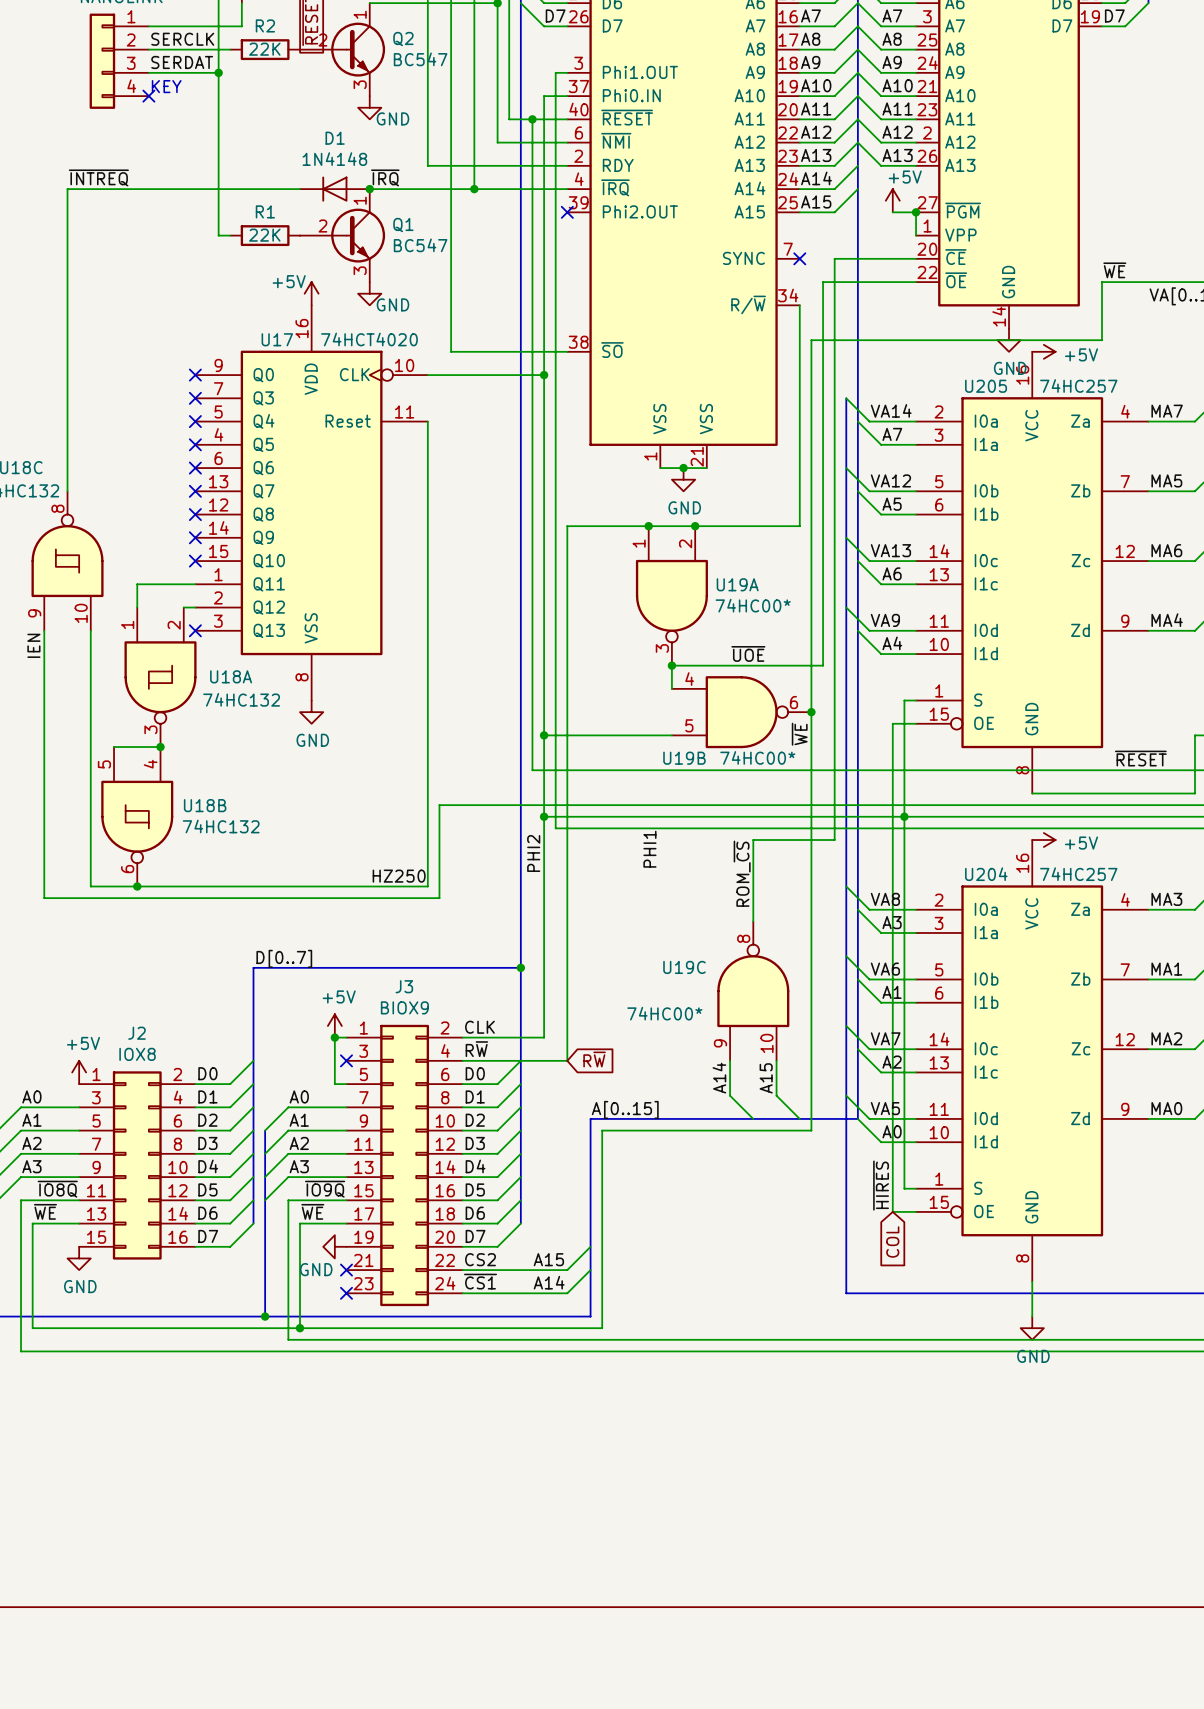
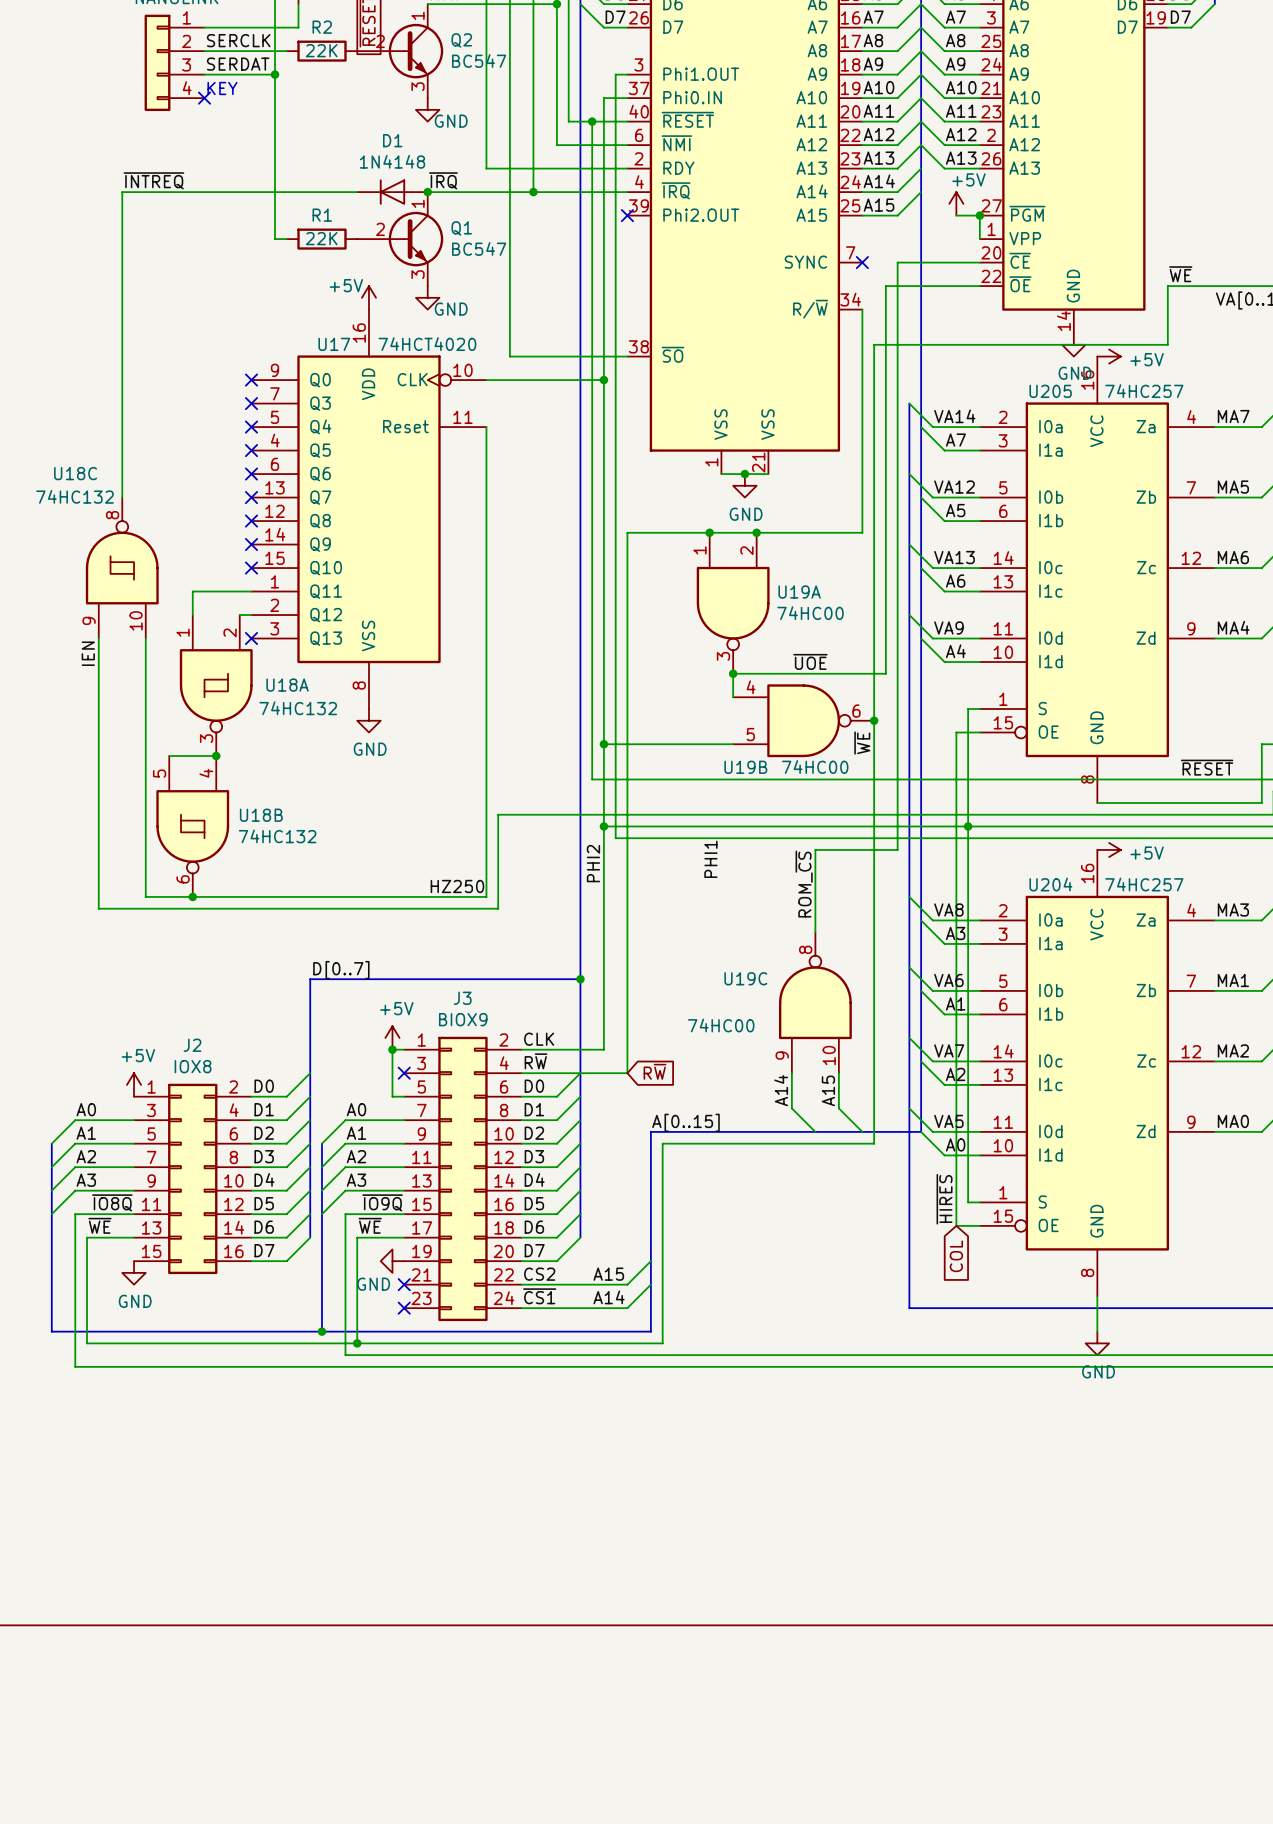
U19A value: 74HC00* (753, 605) -> 74HC00 (810, 613)
U19B value: 74HC00* (757, 757) -> 74HC00 (815, 767)
U19C value: 74HC00* (664, 1013) -> 74HC00 (721, 1025)

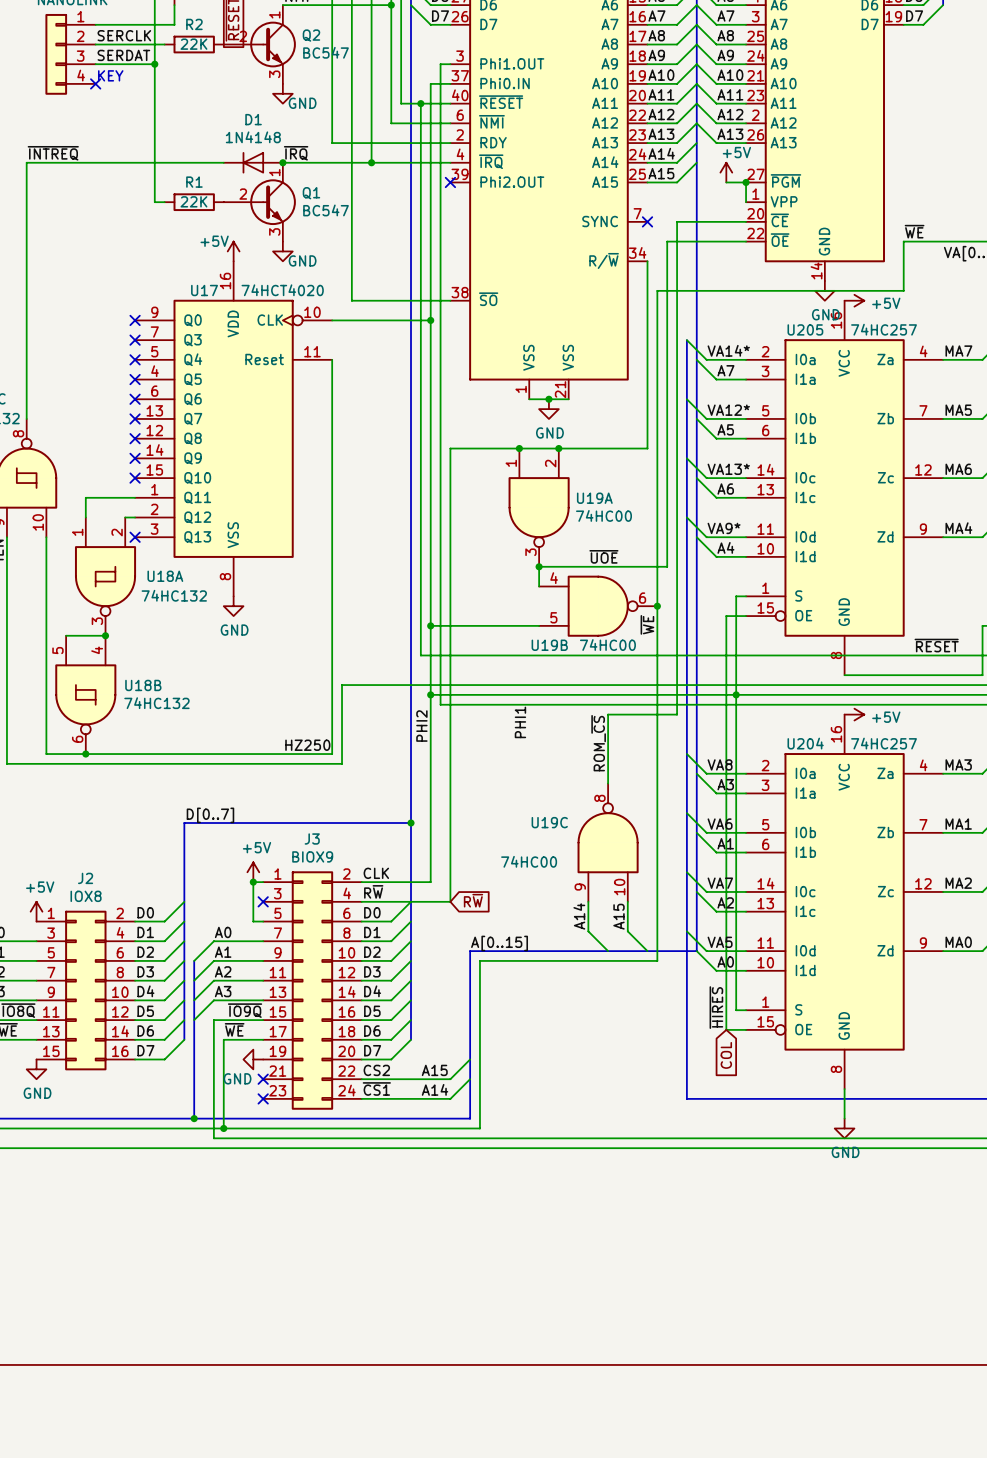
label: VA14 (954, 416) -> VA14* (728, 350)
label: VA12 (954, 487) -> VA12* (728, 410)
label: VA13 (954, 557) -> VA13* (728, 469)
label: VA9 (948, 628) -> VA9* (724, 528)

